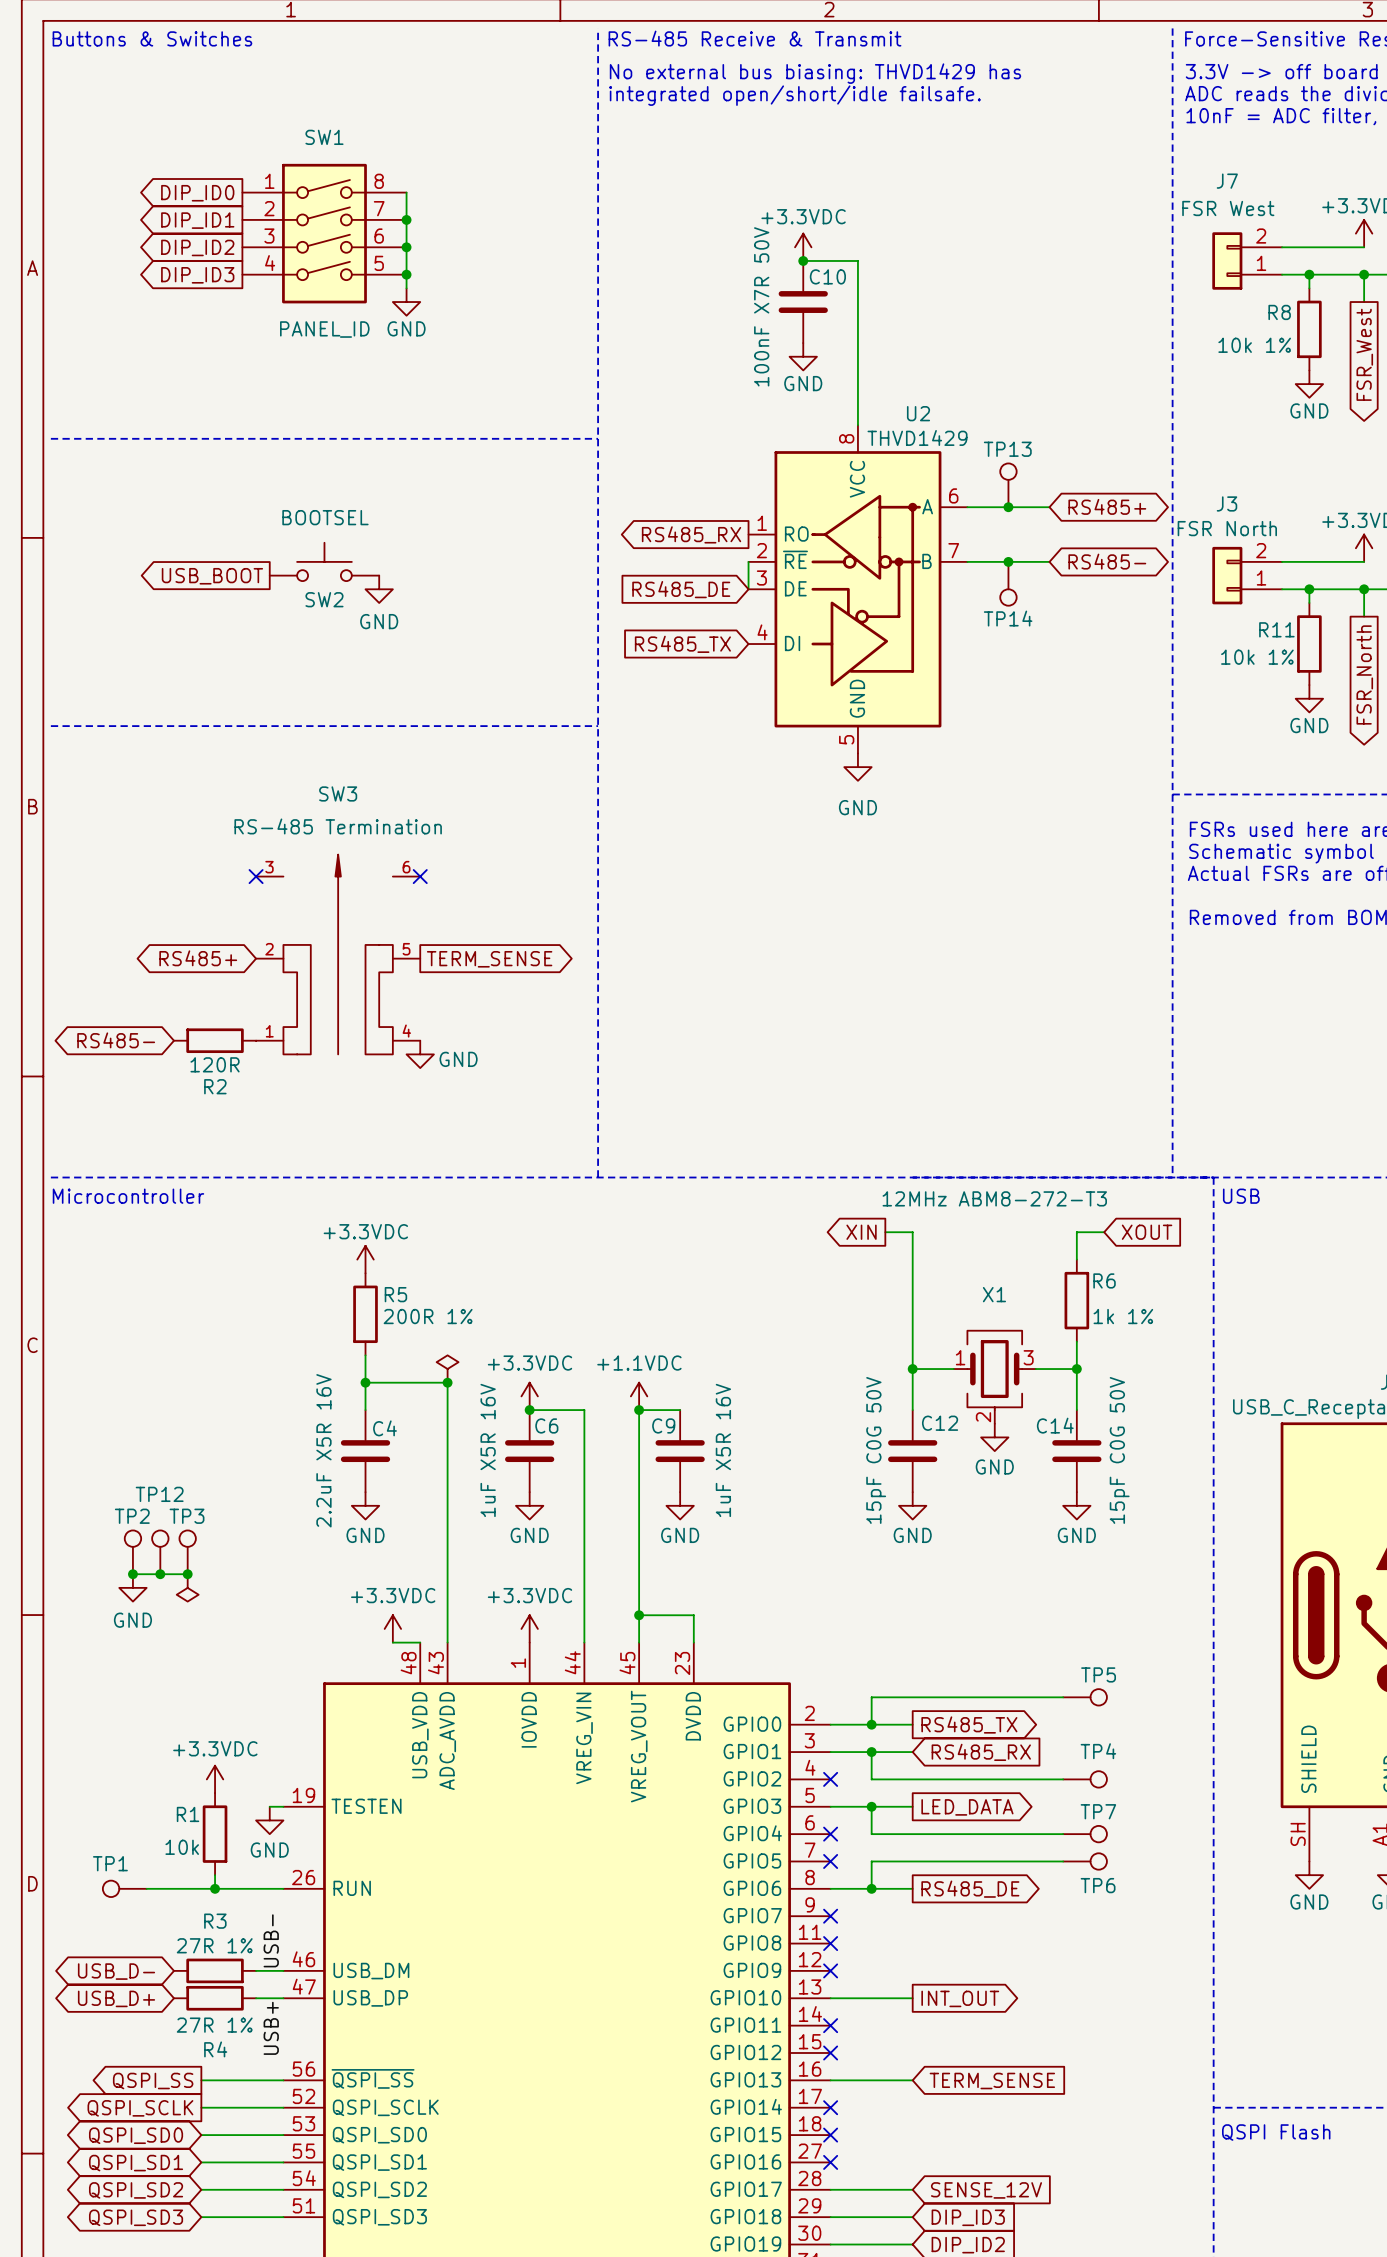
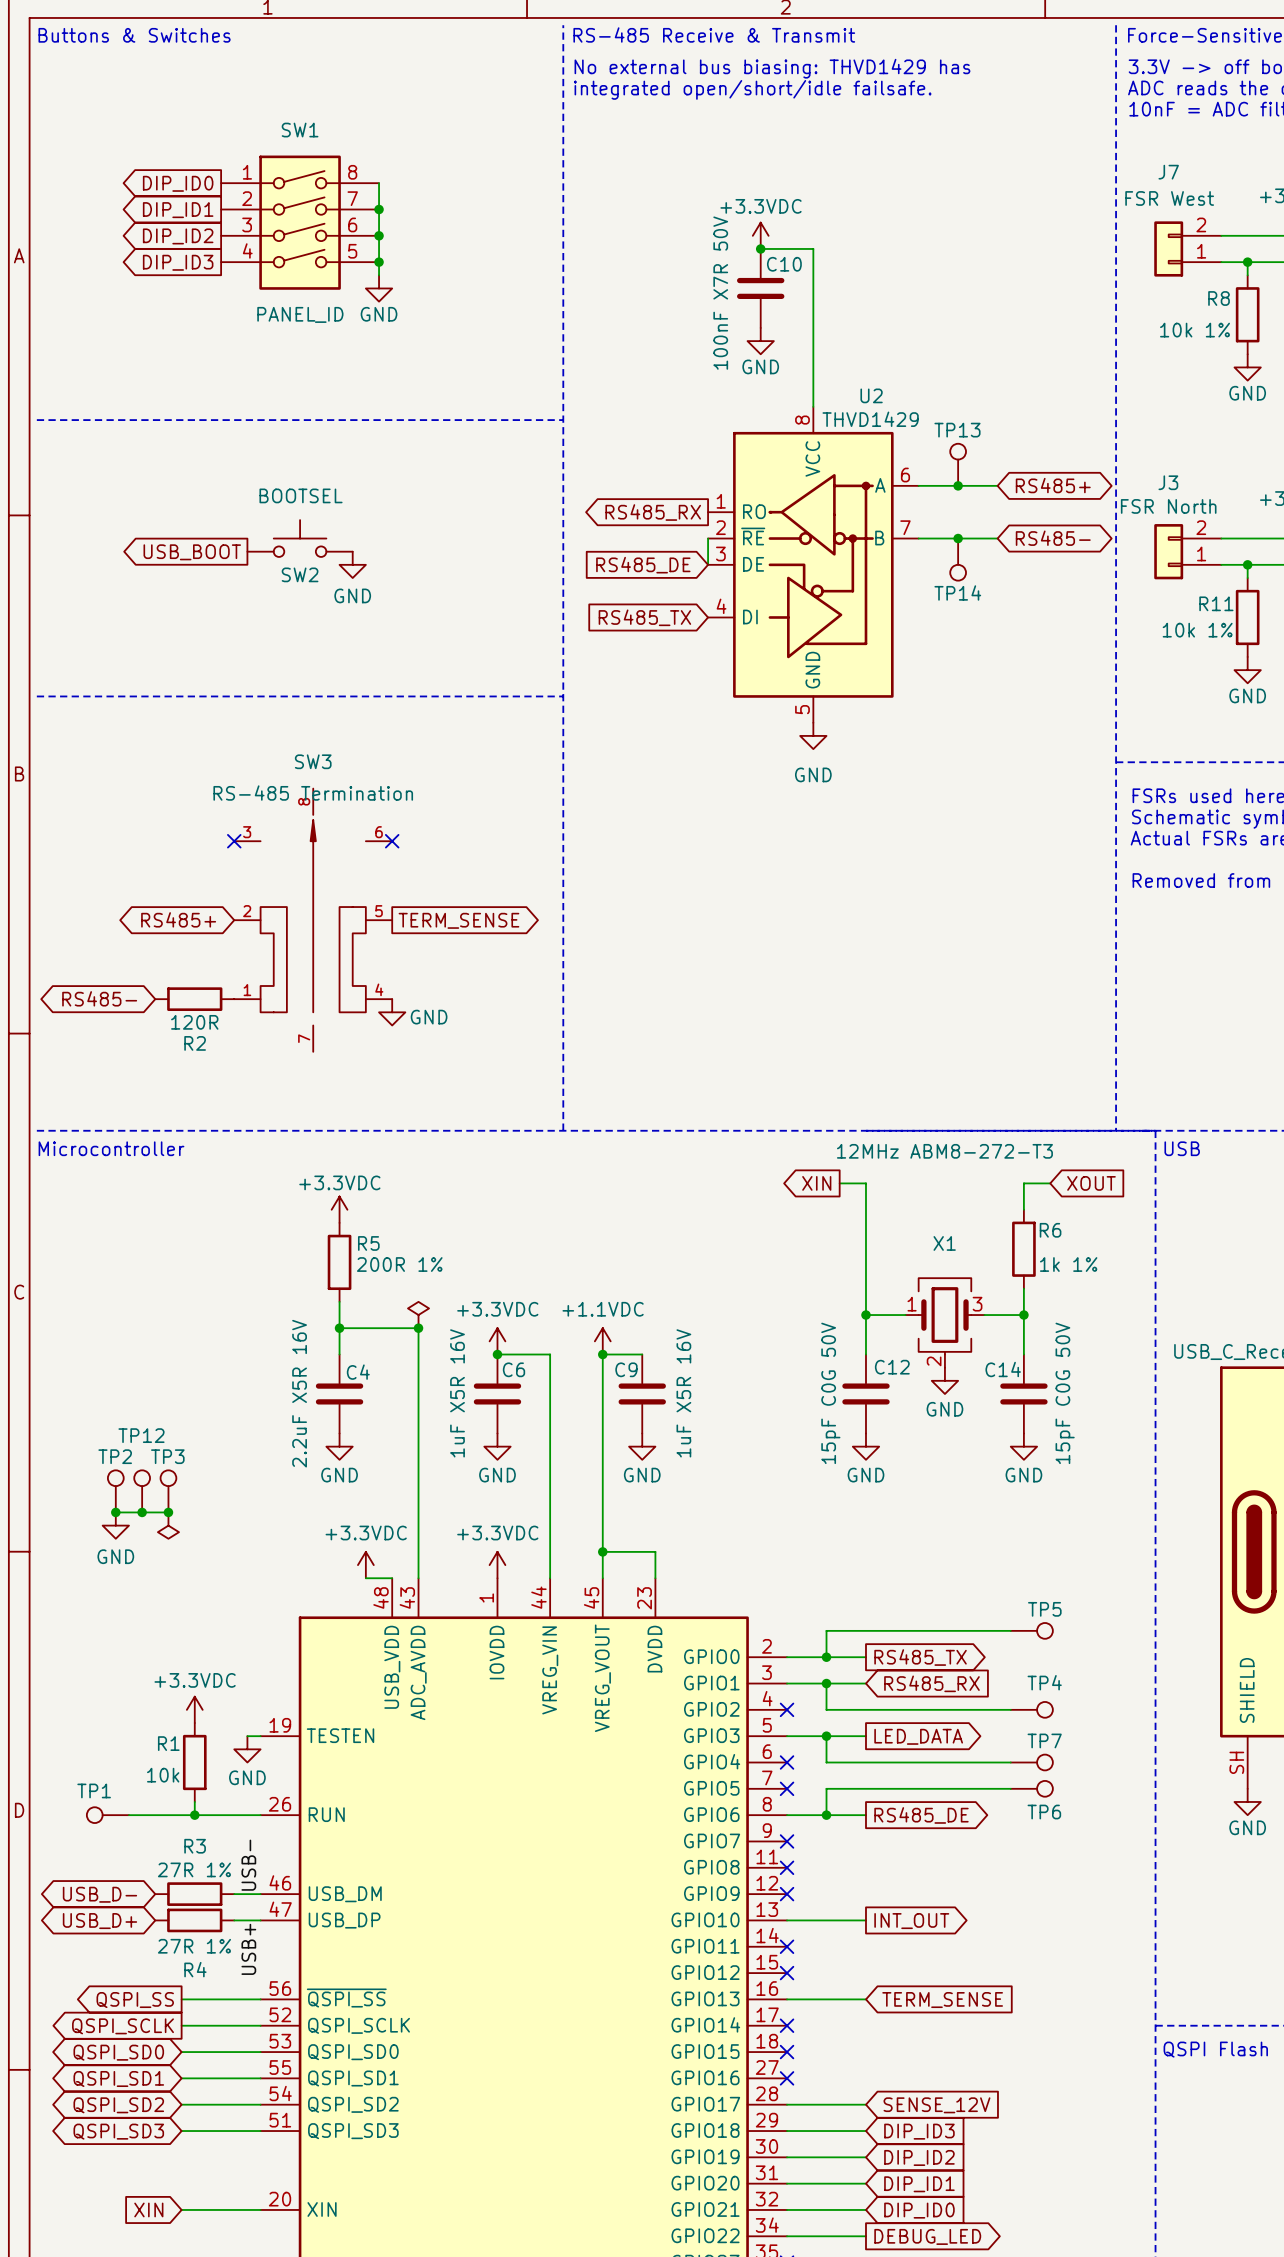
SW3 symbol: [256, 854, 421, 1055] -> [234, 788, 393, 1052]

